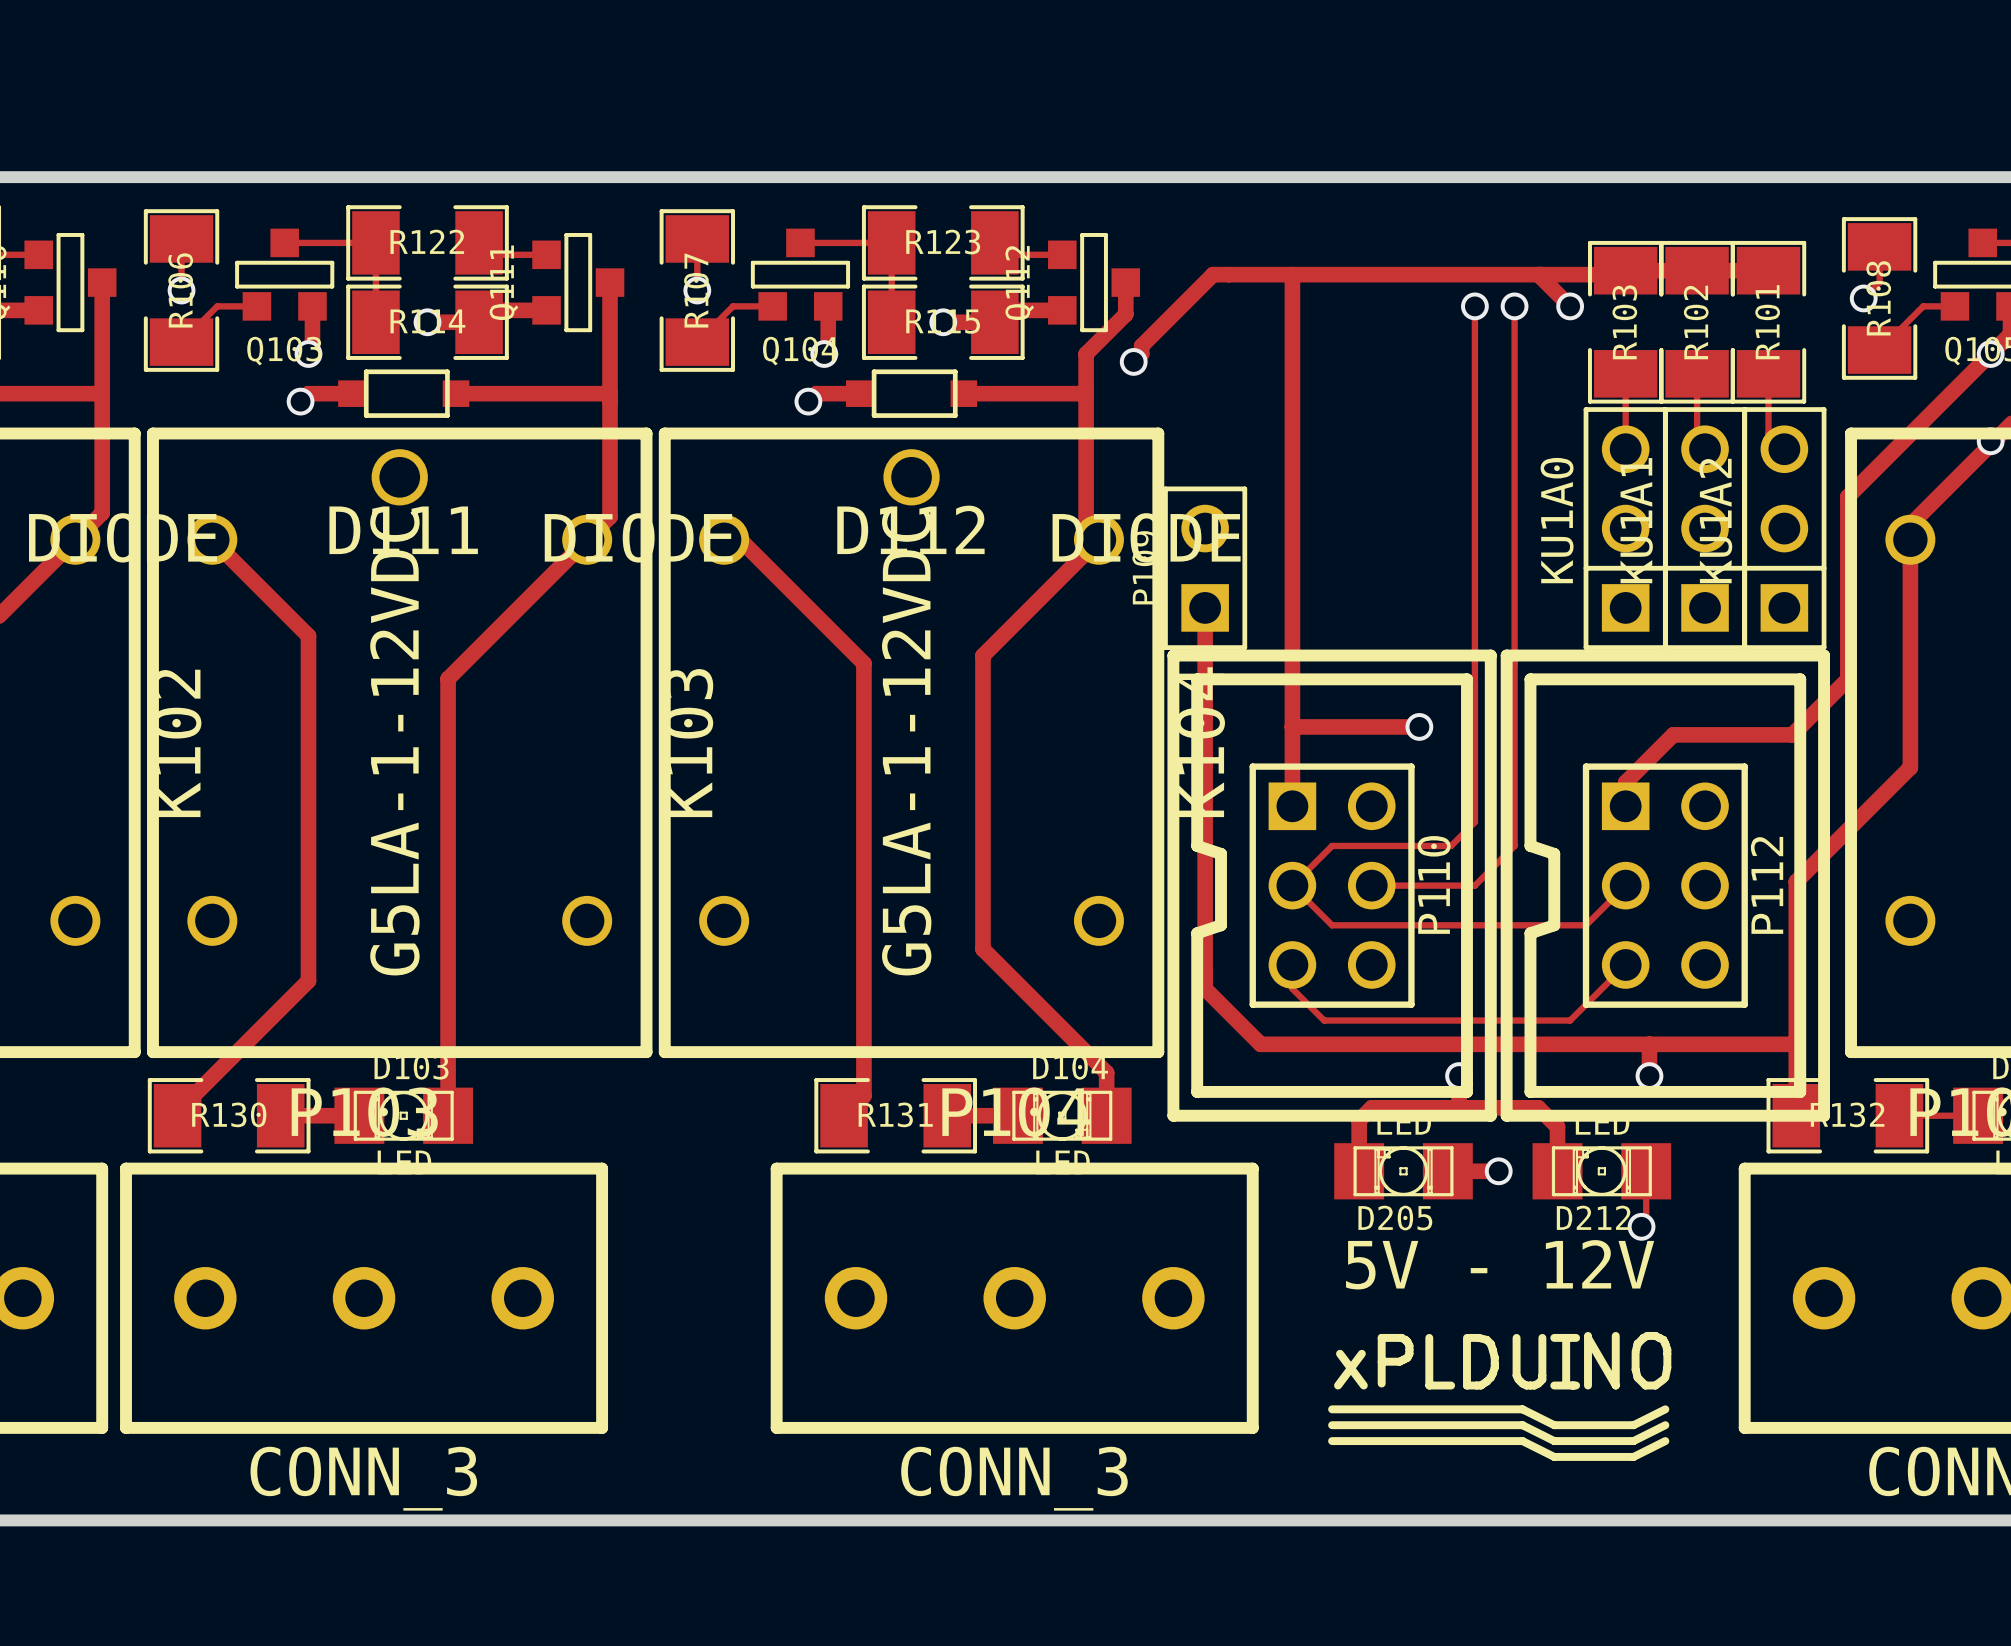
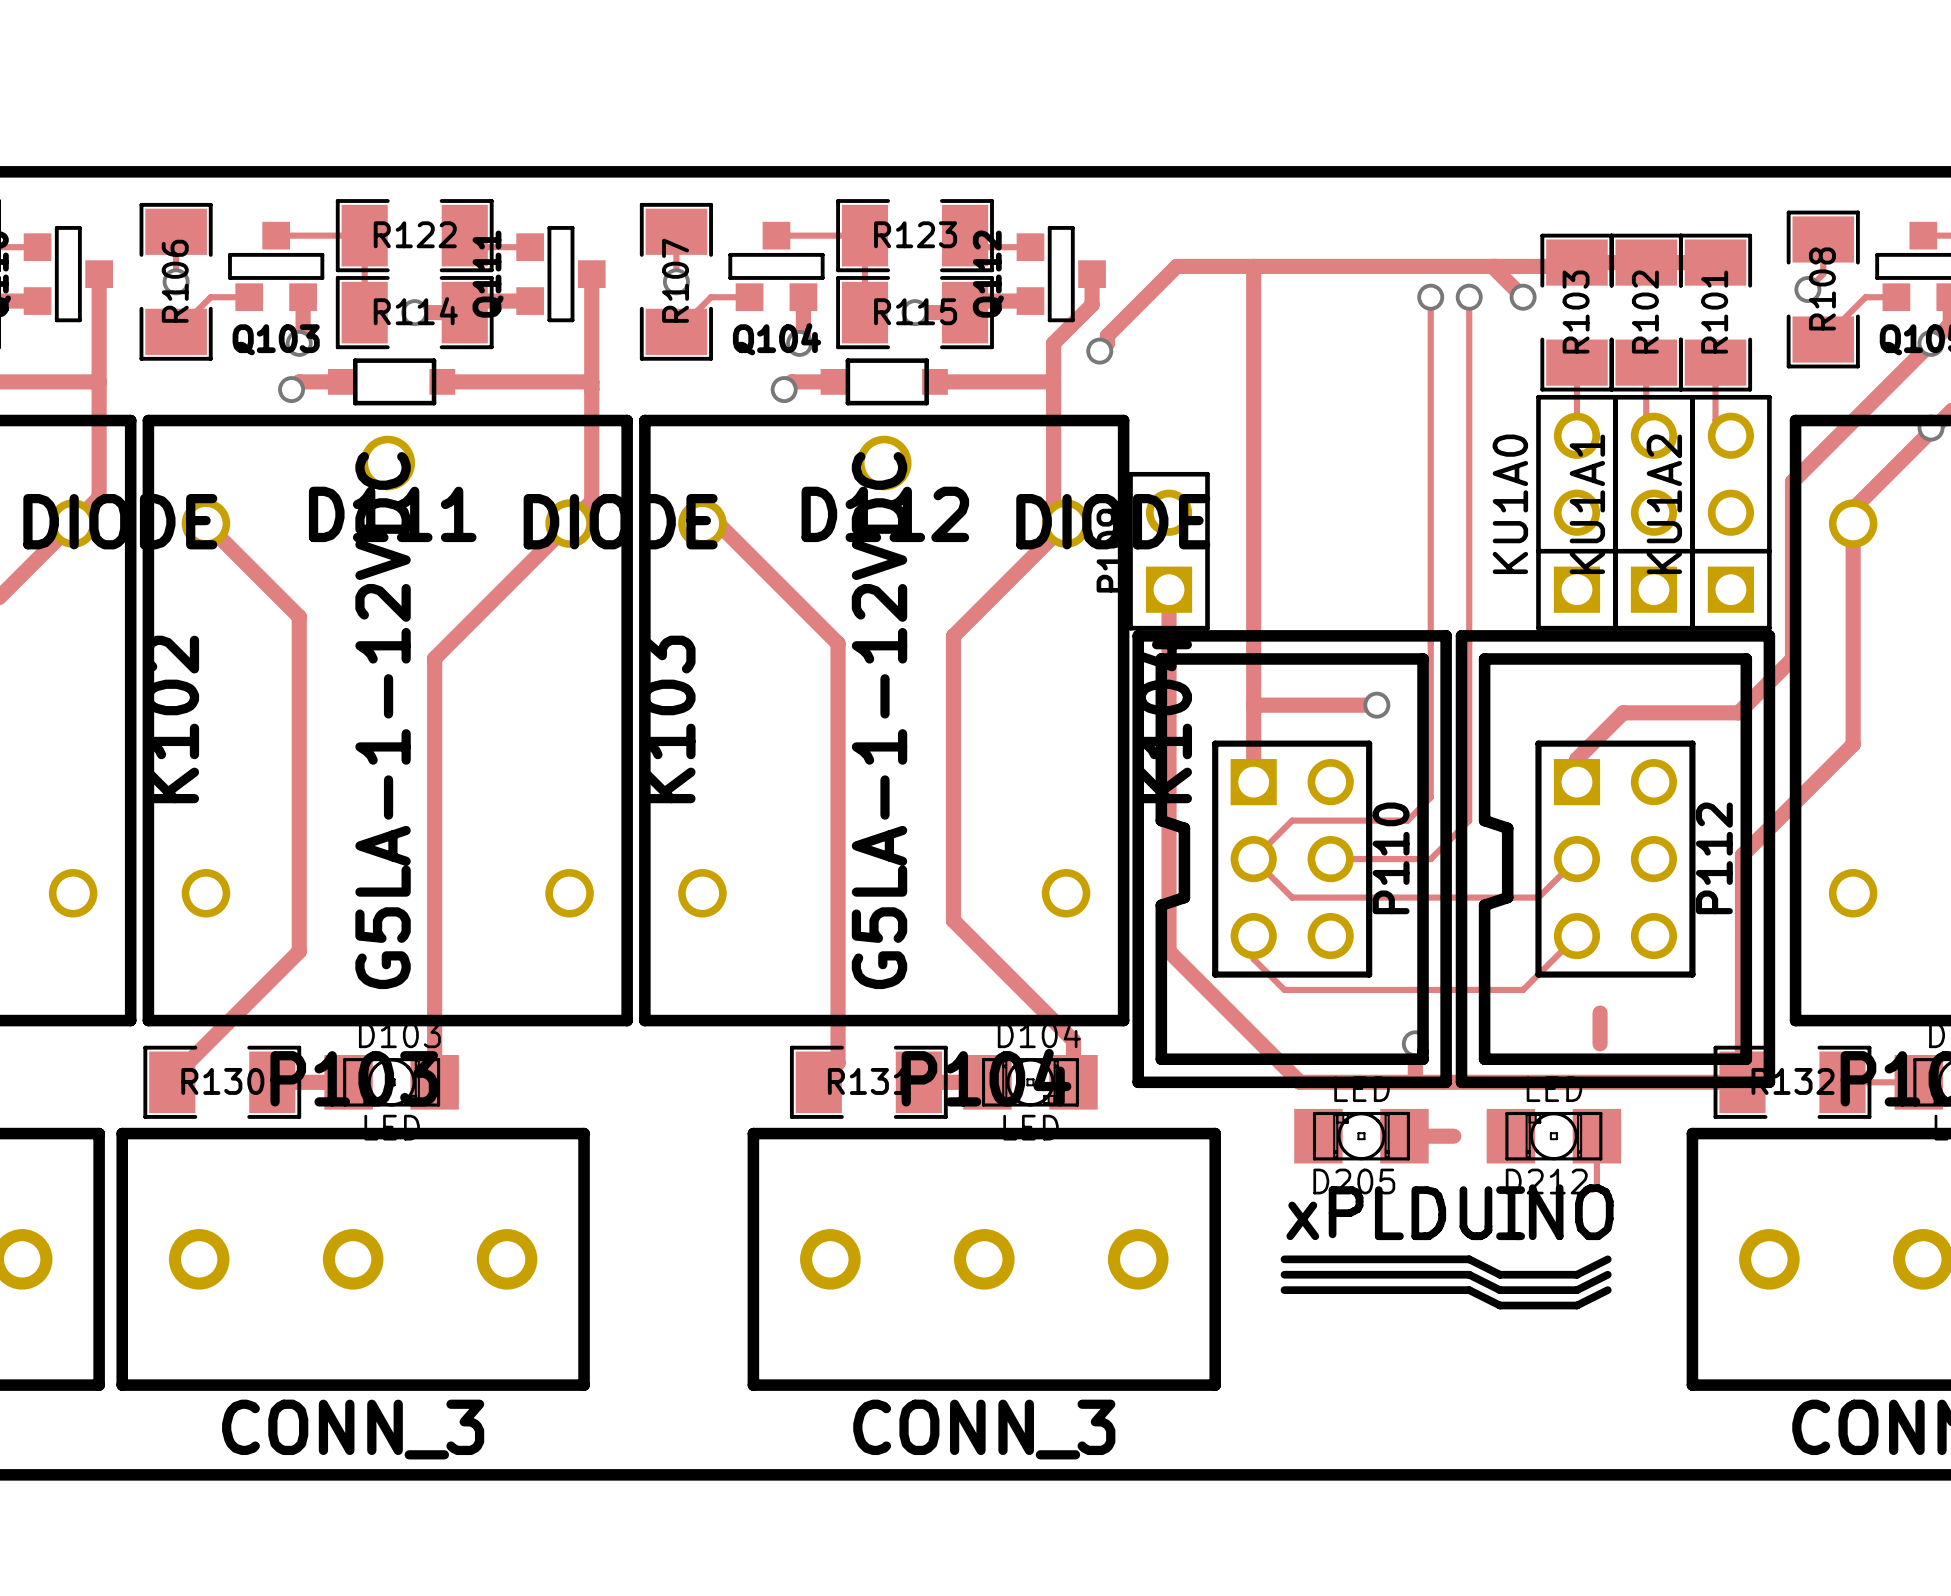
track: (1205, 980) (1205, 988) (1260, 1044) (1796, 1044) -> (1169, 951) (1299, 1082) (1742, 1082)
via: (1649, 1076) -> none
track: (1359, 1171) (1359, 1120) (1371, 1107) (1538, 1107) (1557, 1126) (1557, 1171) -> none
via: (1498, 1171) -> none
via: (1641, 1226) -> none
text: 5V - 12V (1500, 1264) -> none
drawing position: (1499, 1396) -> (1447, 1246)

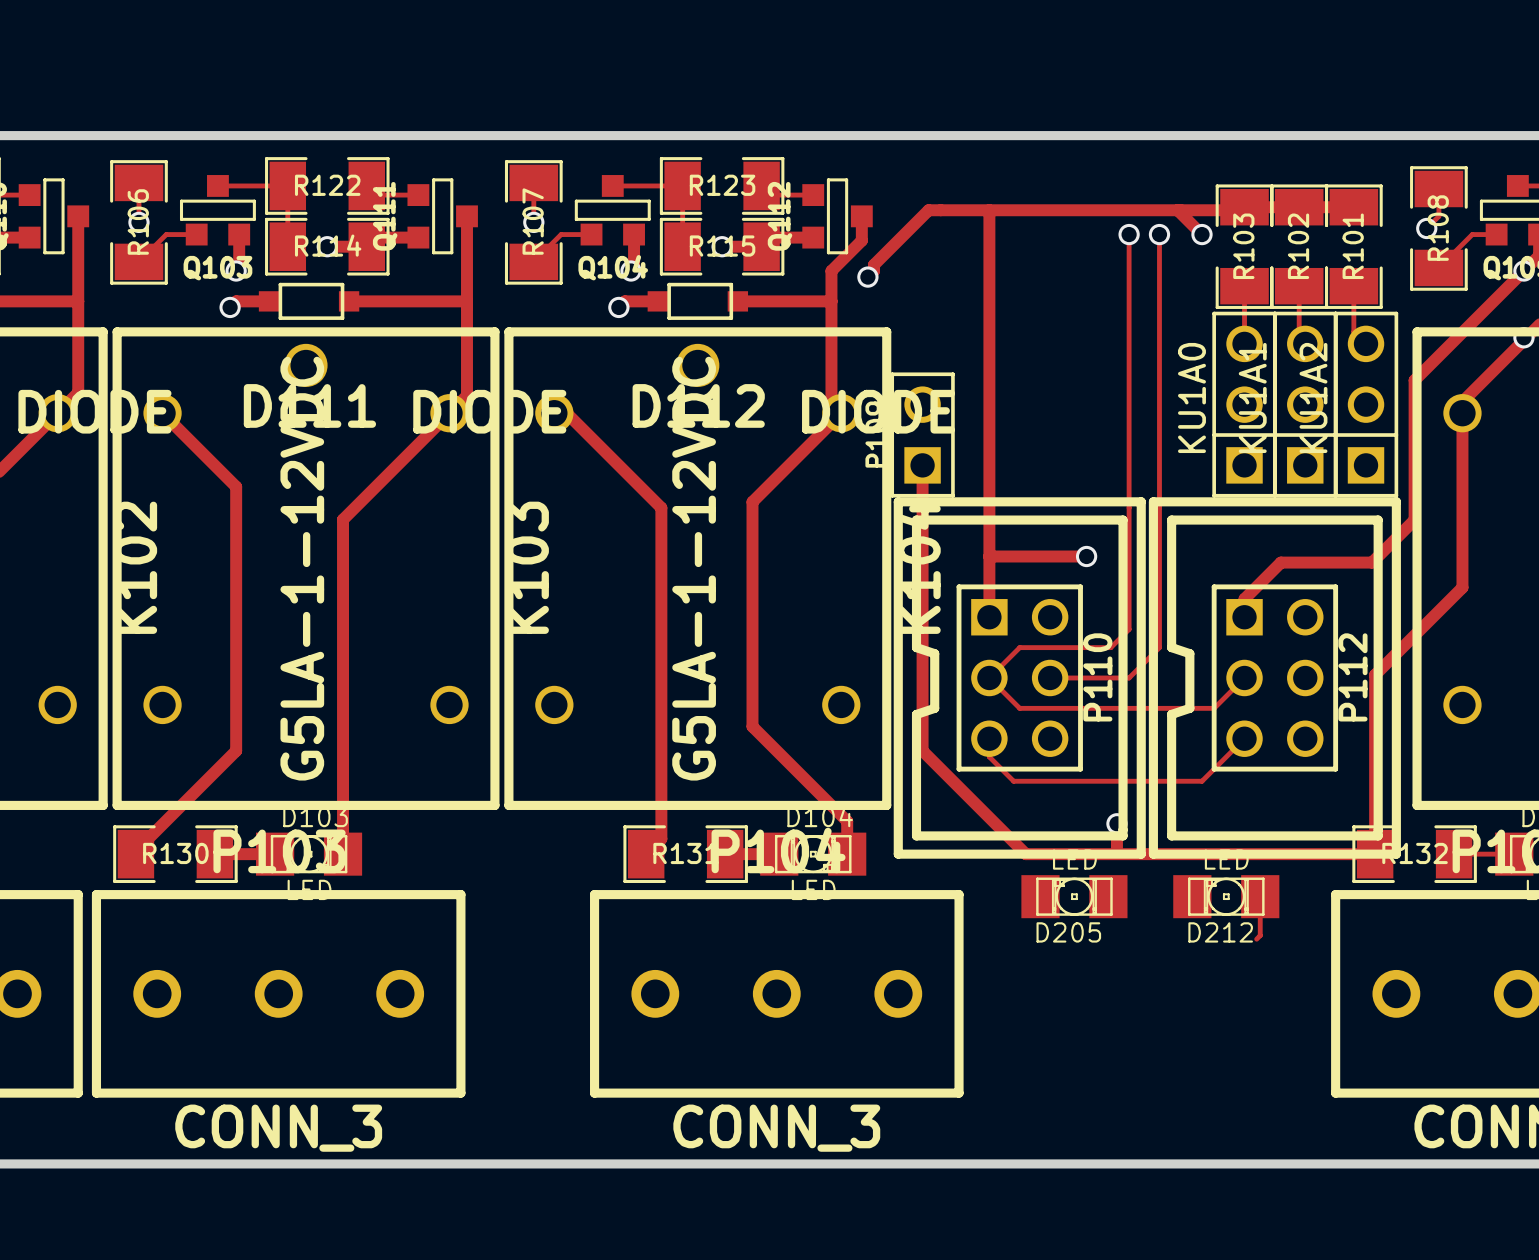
track: (1600, 1013) (1600, 1043) -> none
track: (1404, 1136) (1453, 1136) -> none
drawing: [1280, 1184, 1614, 1310] -> none

